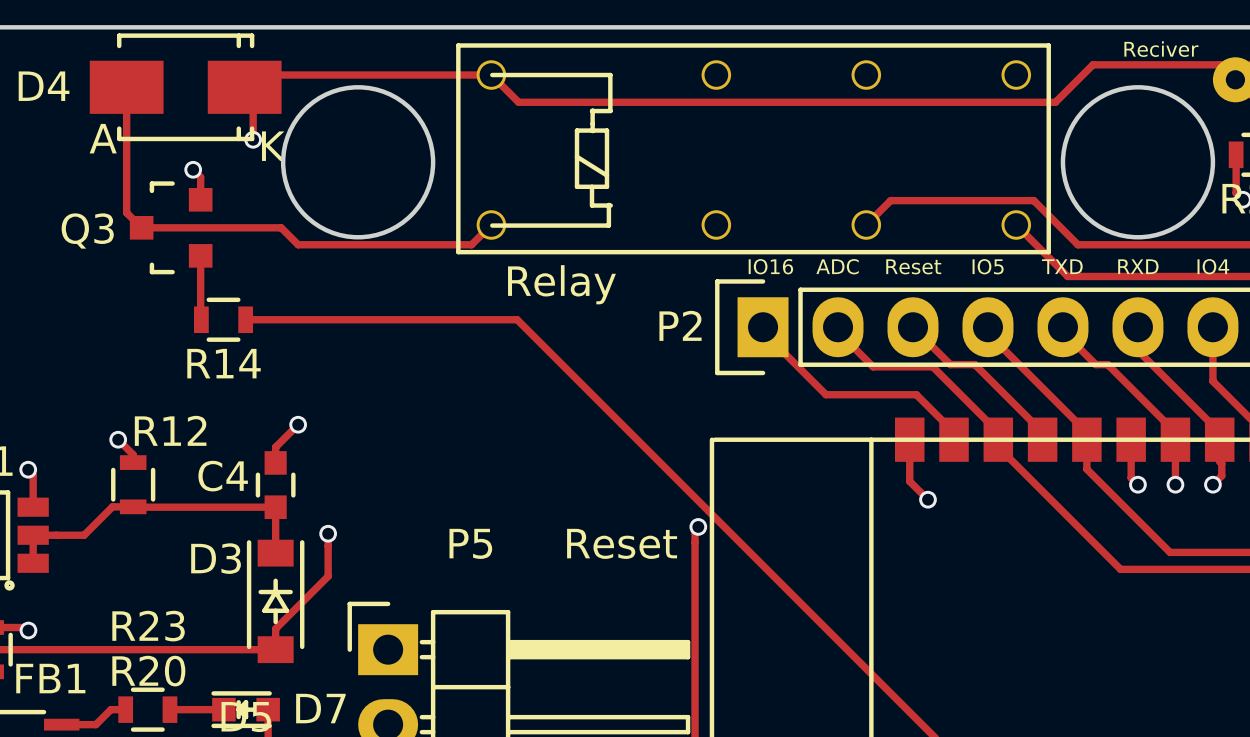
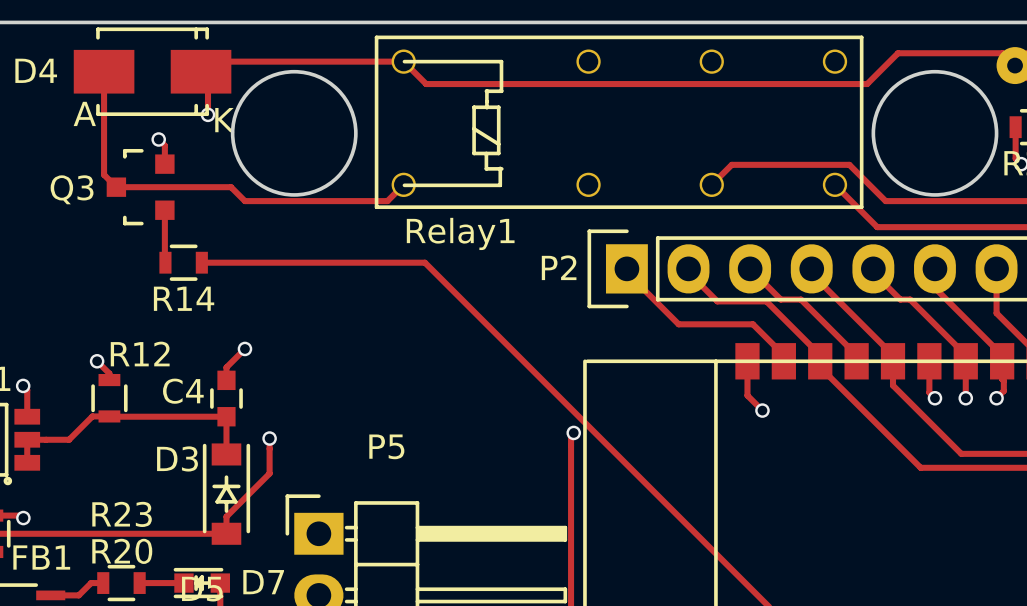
text: Reciver (1161, 49) -> none
text: IO16 (770, 266) -> none
text: ADC (837, 266) -> none
text: Reset (913, 266) -> none
text: IO5 (988, 266) -> none
text: TXD (1062, 266) -> none
text: RXD (1138, 266) -> none
text: IO4 (1213, 266) -> none
Relay name: Relay (561, 284) -> Relay1 (460, 233)
text: Reset (622, 543) -> none

